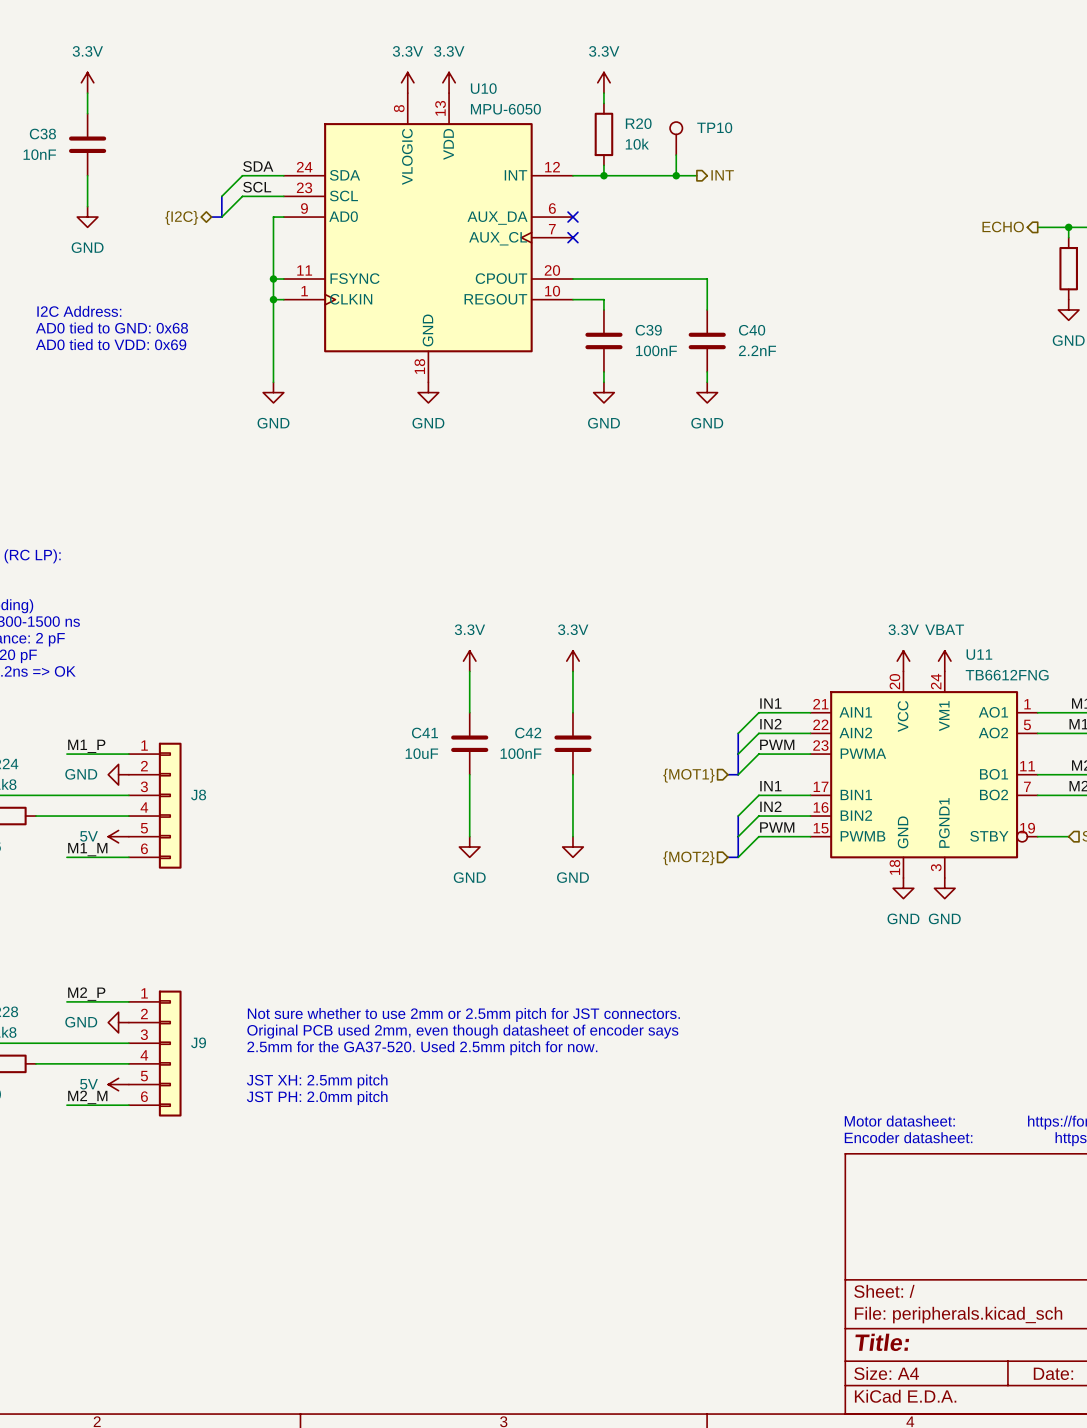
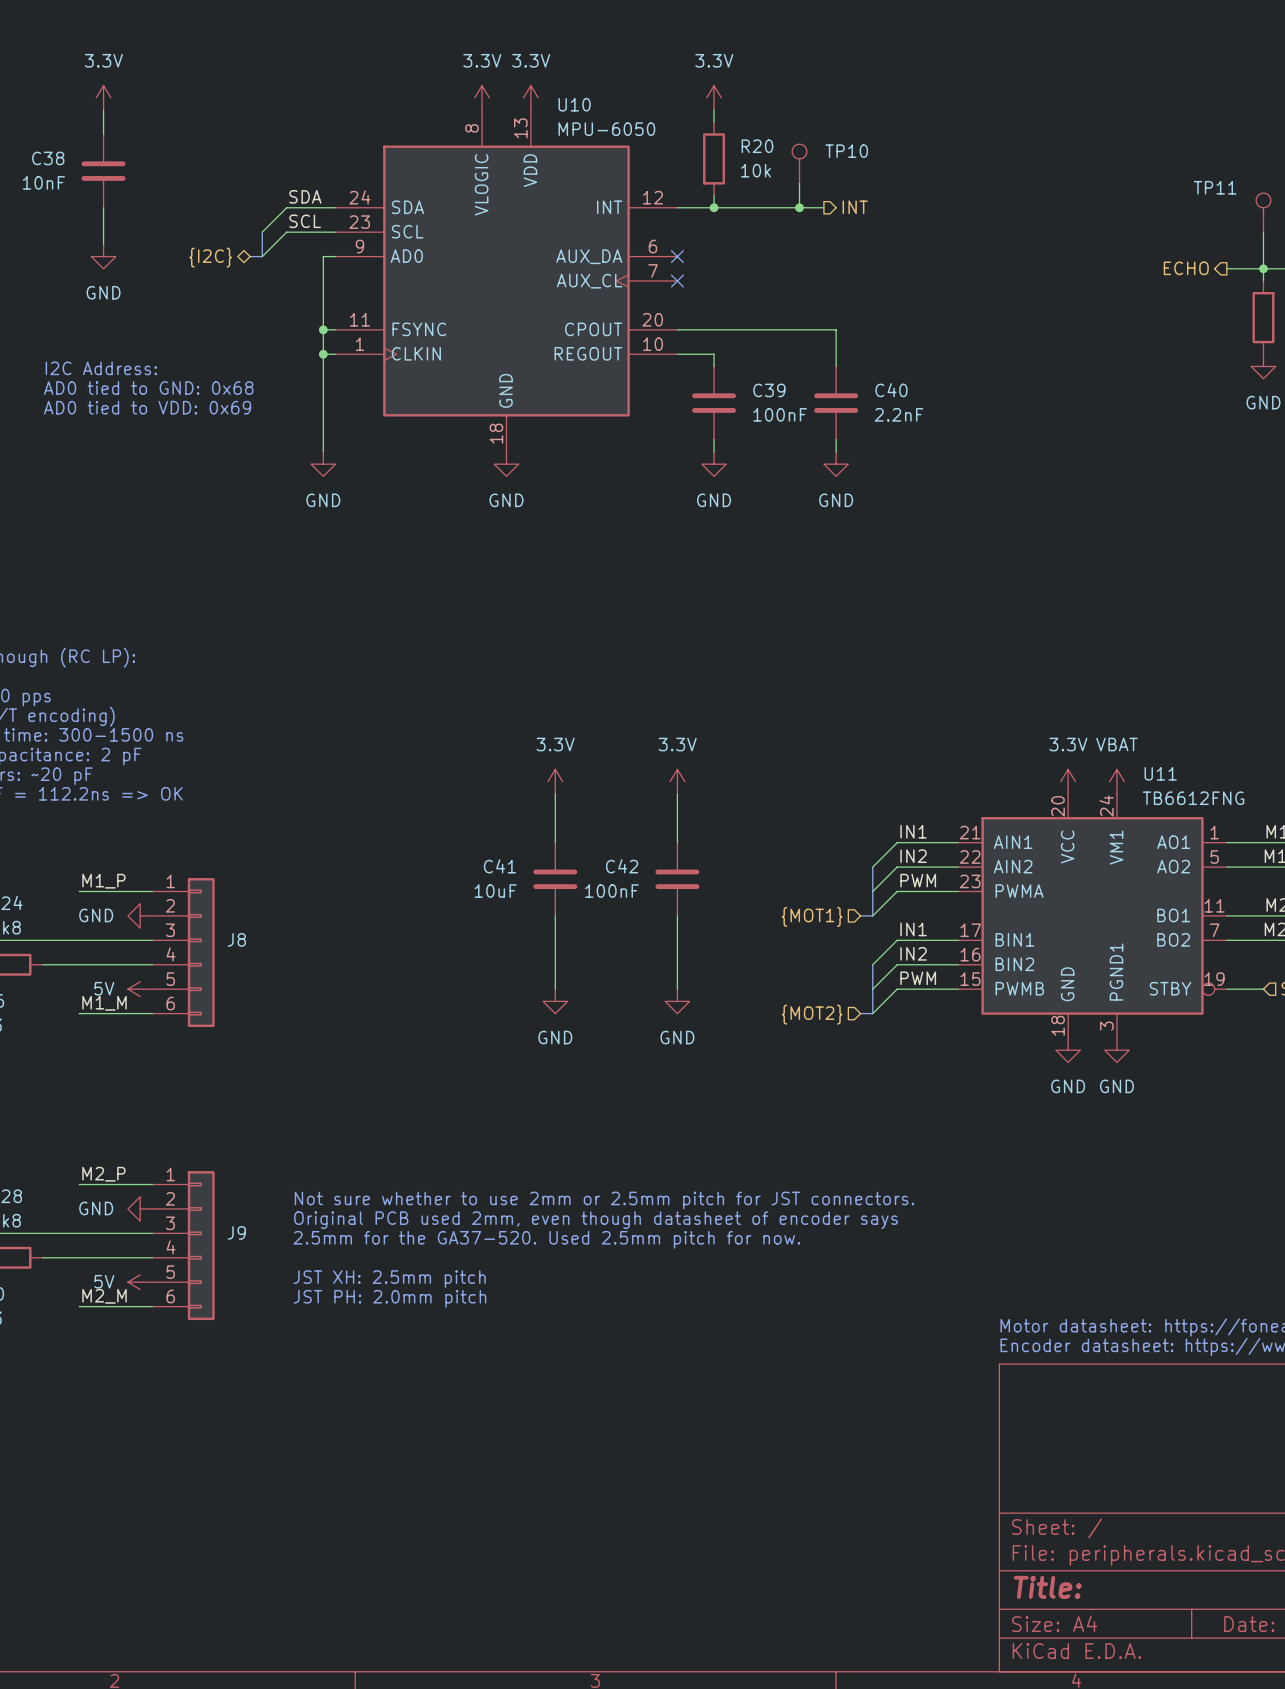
TP11: none -> (1263, 212)
wire: none -> (1263, 232) (1263, 268)

